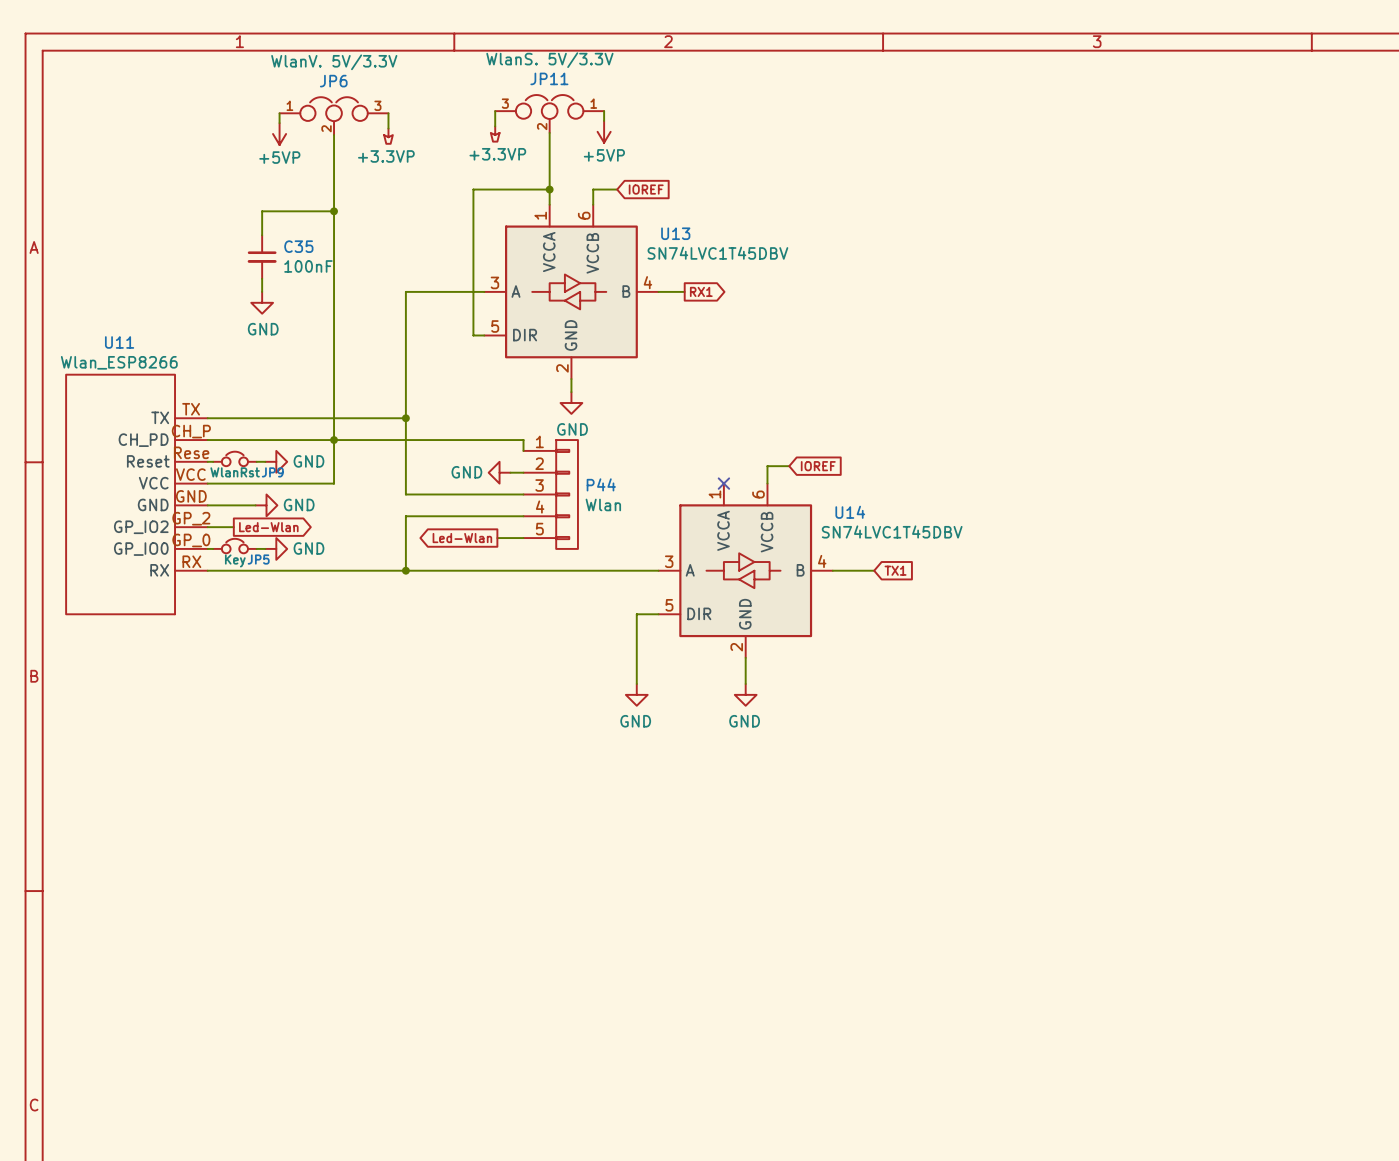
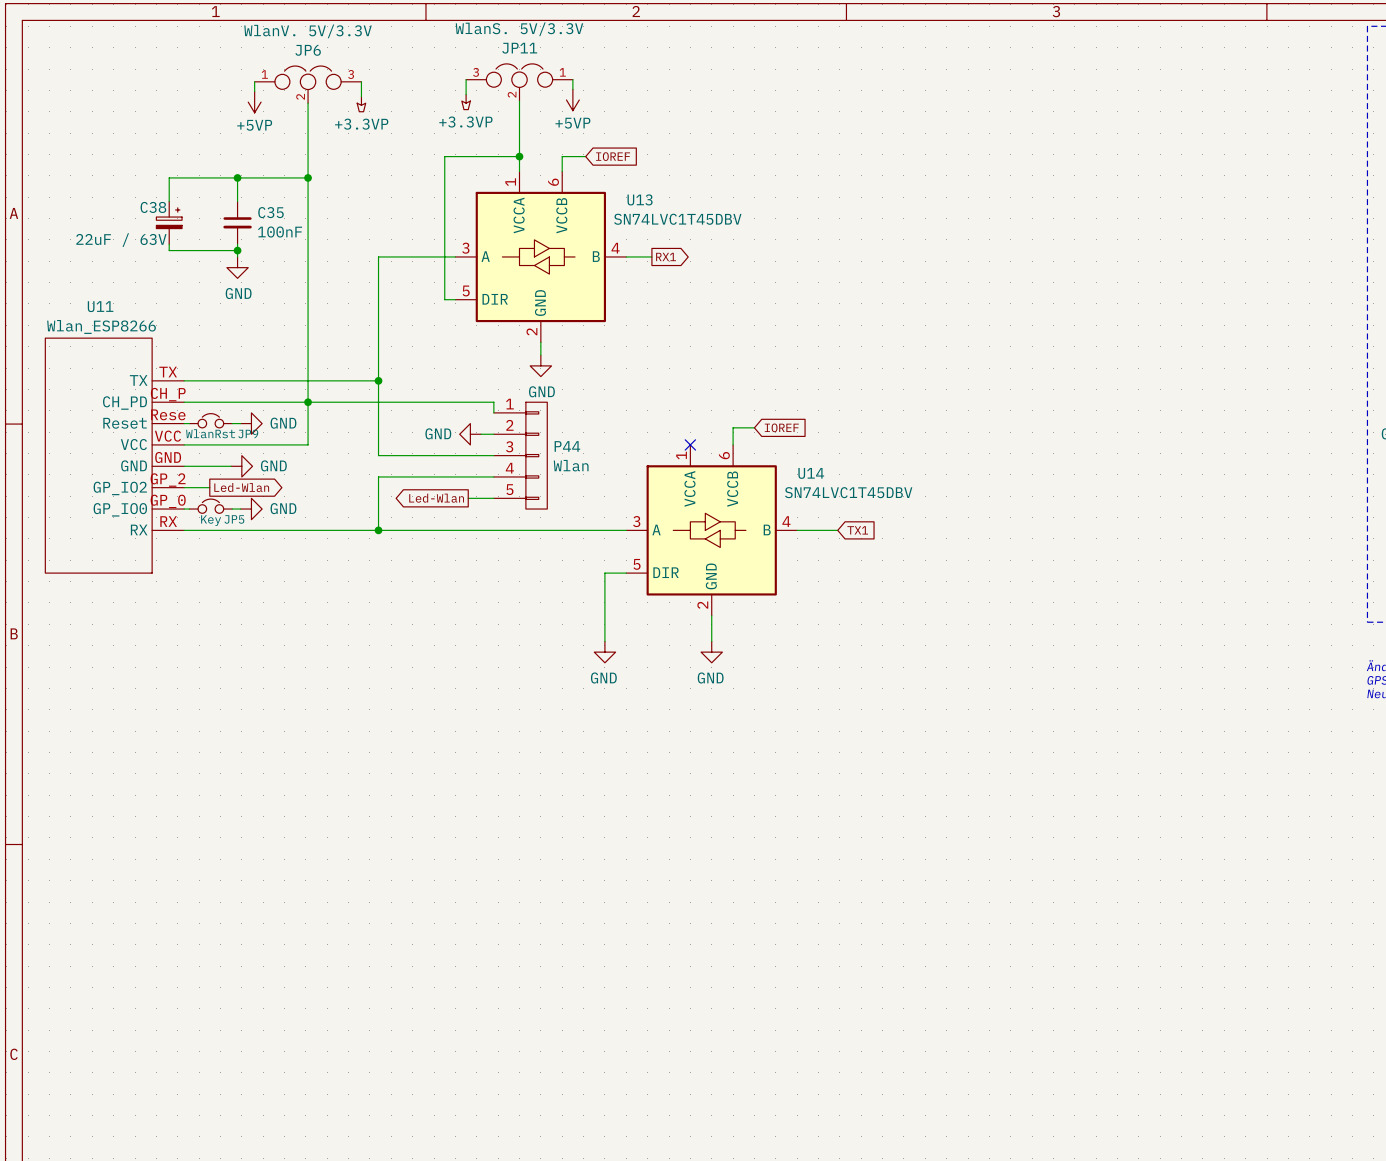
wire: none -> (237, 177) (169, 177) (169, 201)
junction: none -> (237, 177)
C38: none -> 22uF / 63V (169, 222)
wire: none -> (169, 244) (169, 250) (237, 250)
junction: none -> (237, 250)

